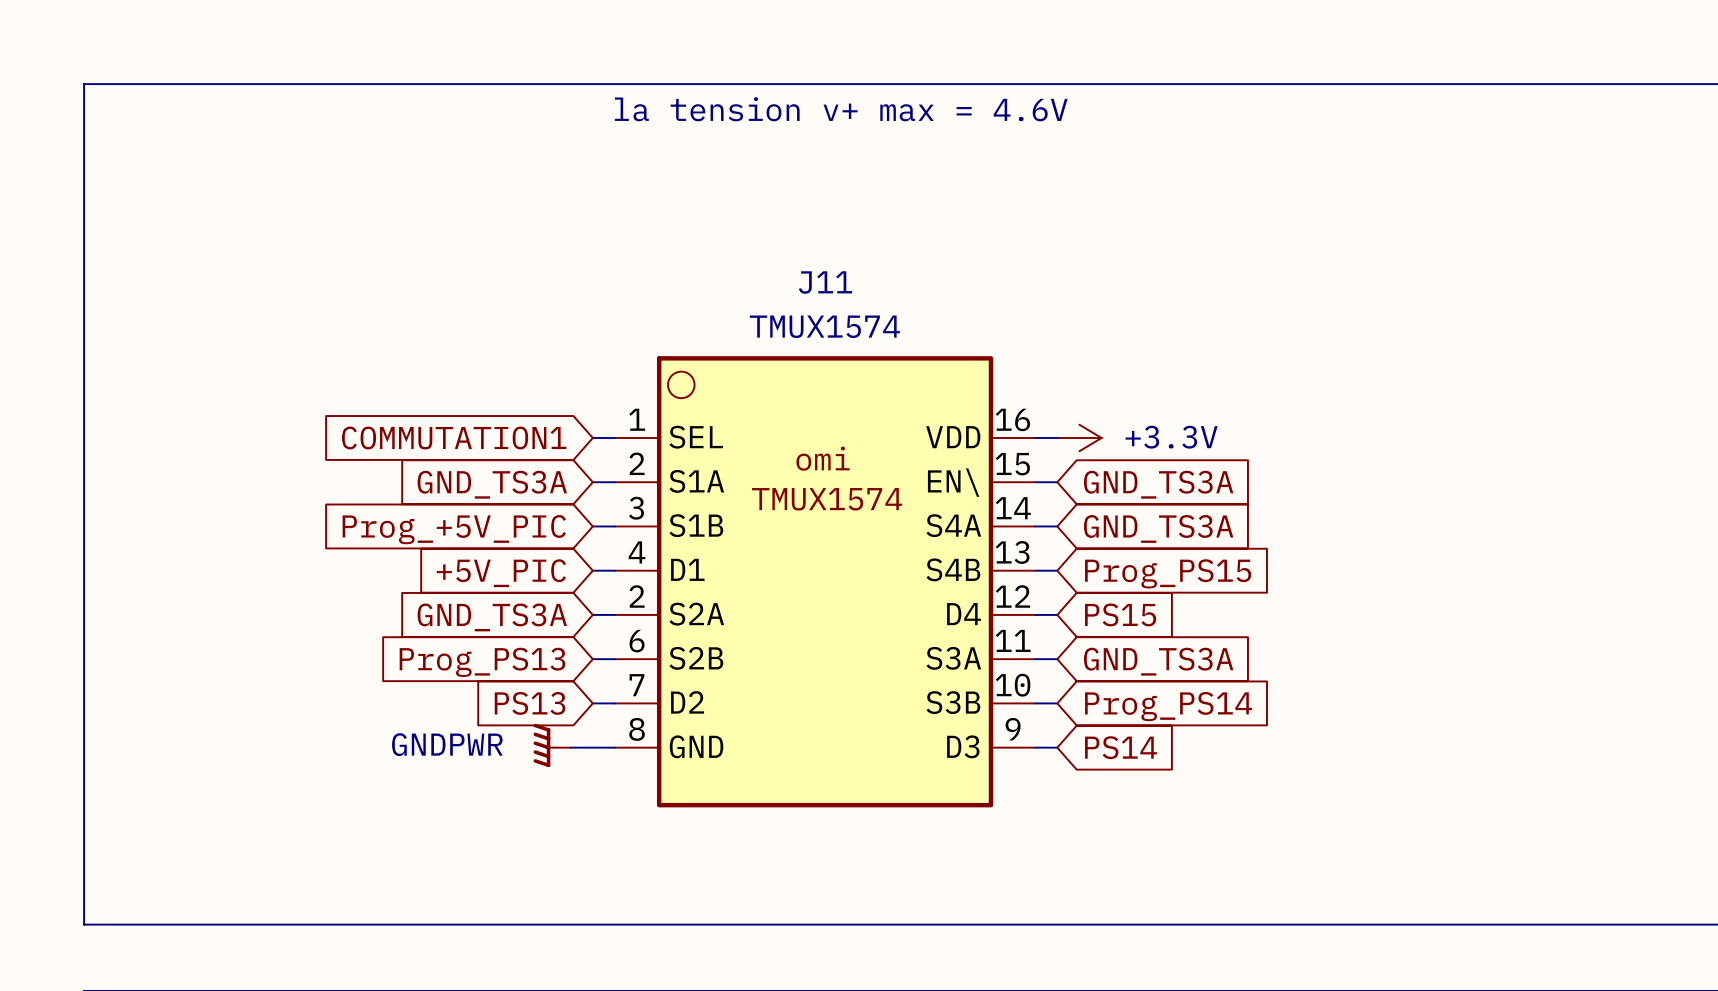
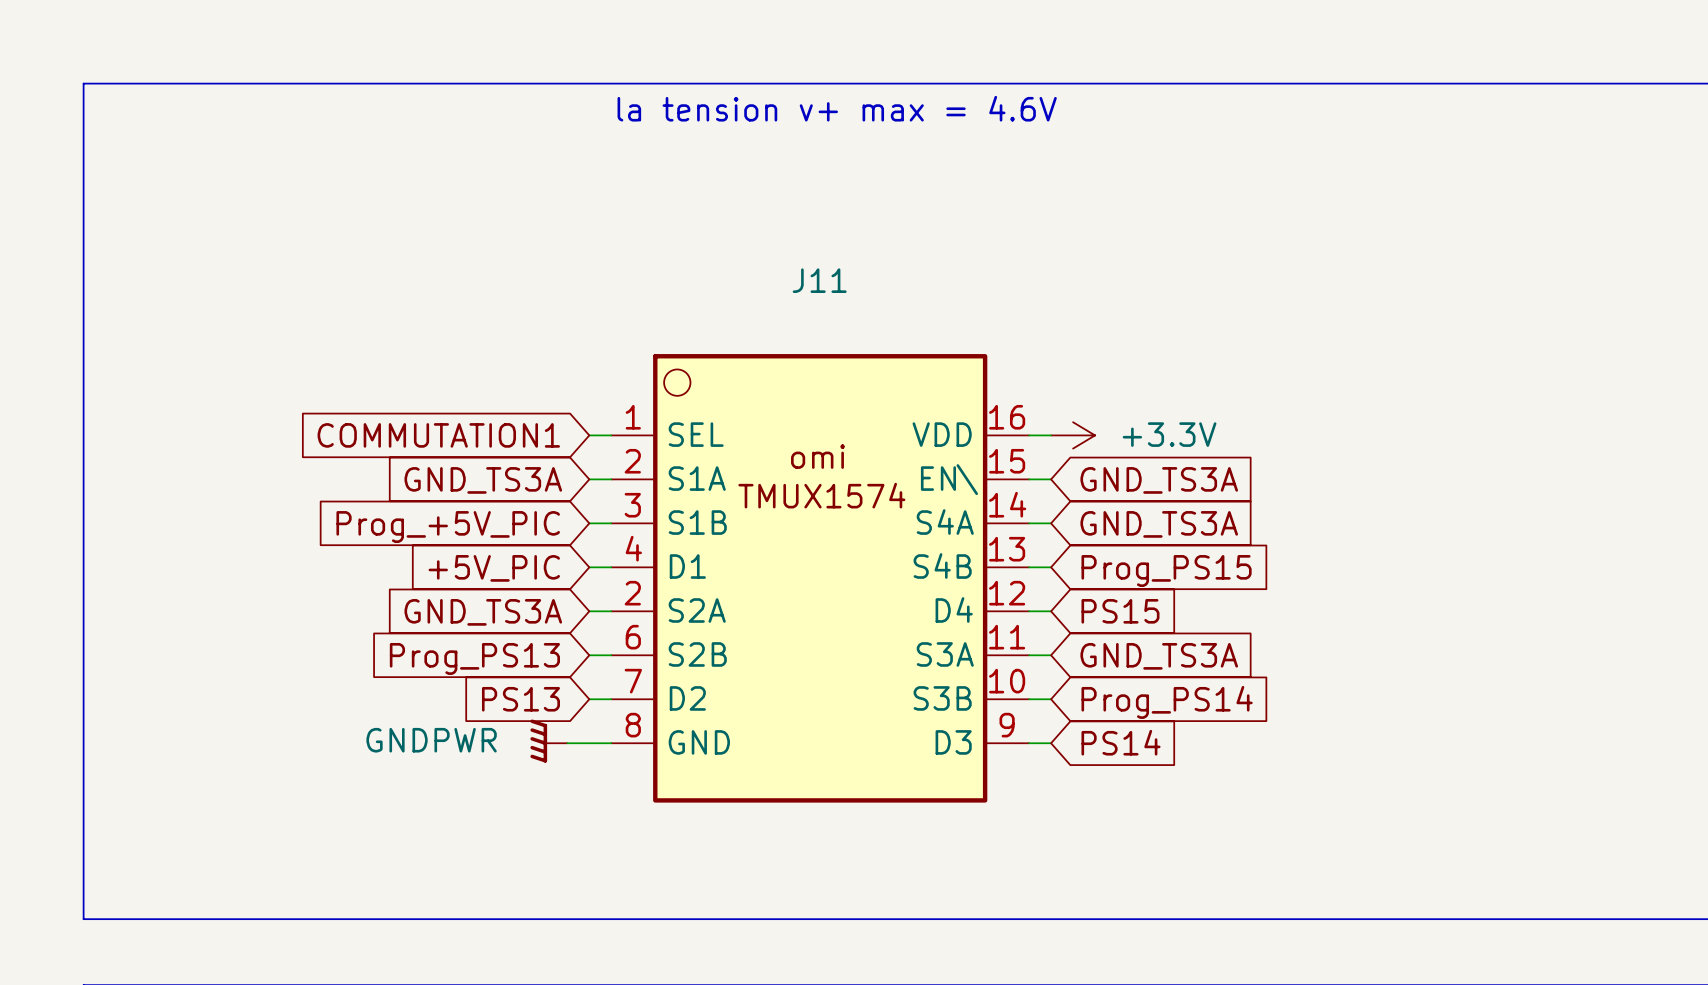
J11 value: TMUX1574 (824, 326) -> none

